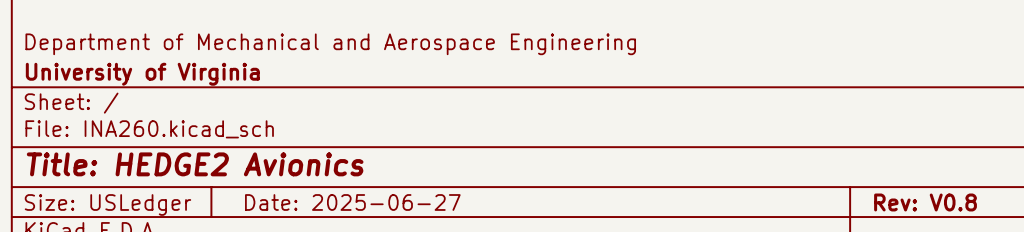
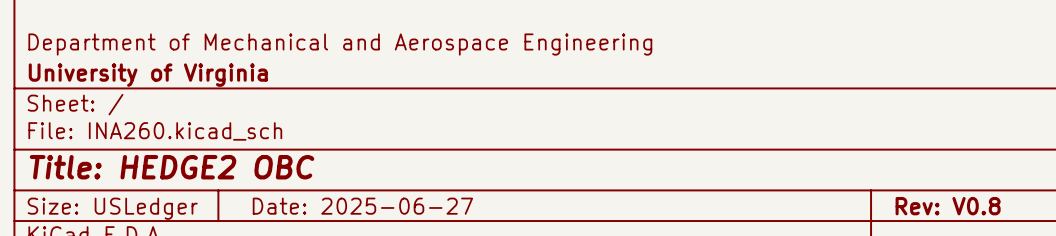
title block: Title: HEDGE2 Avionics (195, 164) -> Title: HEDGE2 OBC (172, 167)

